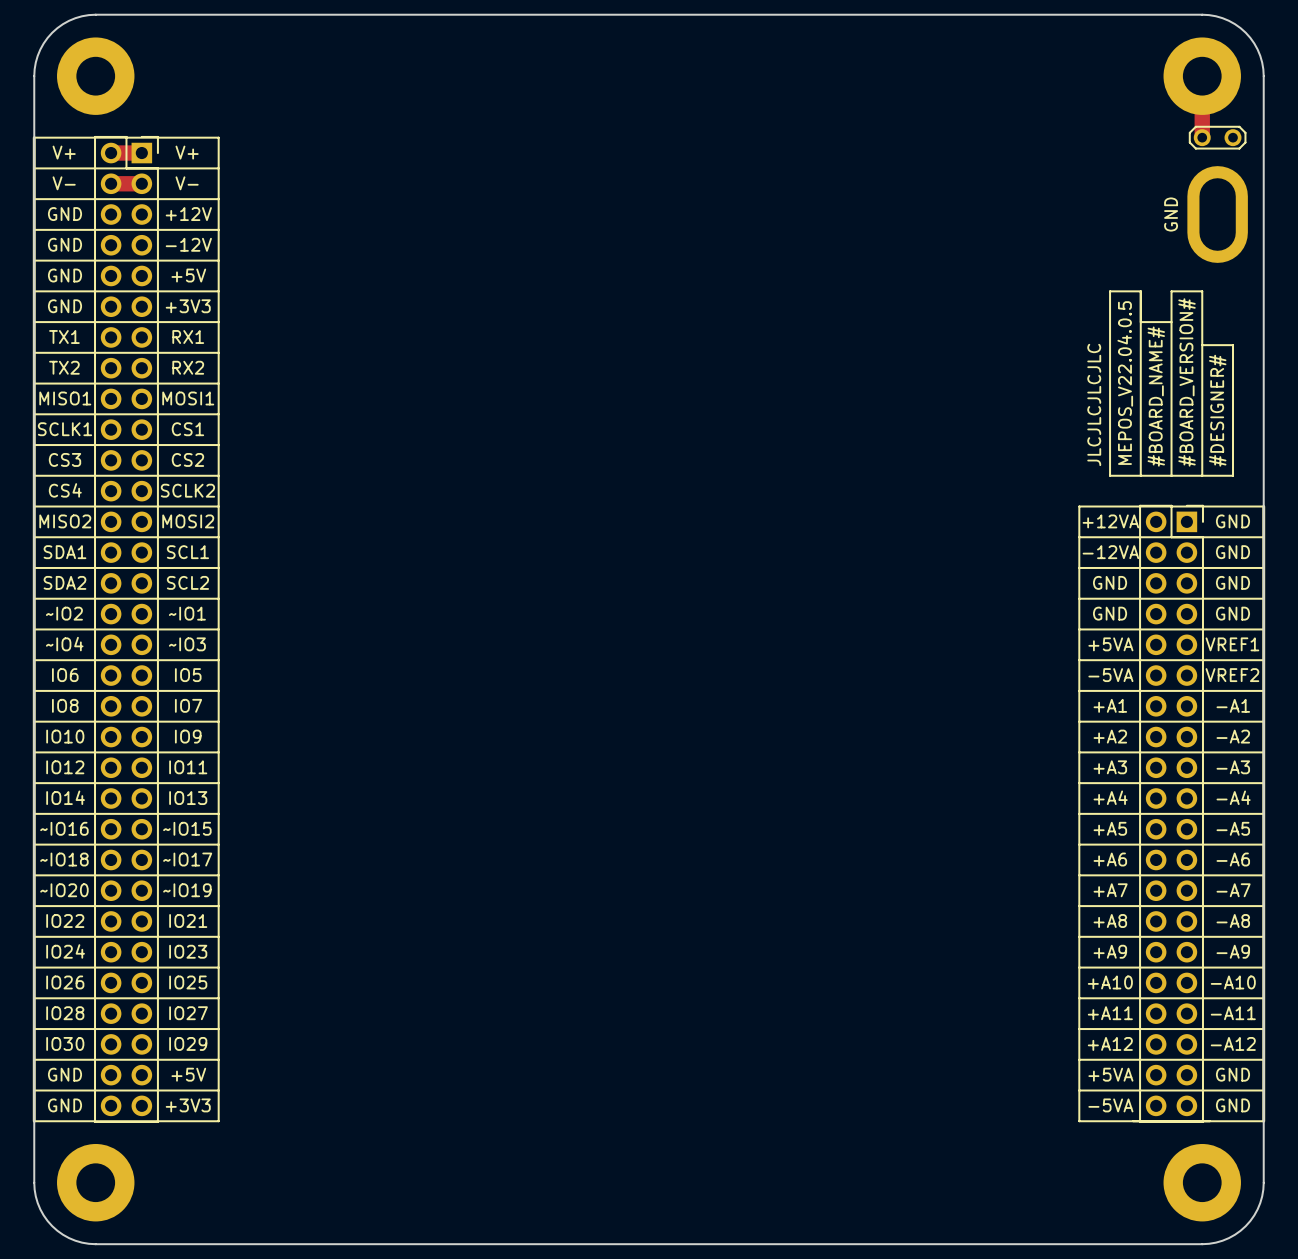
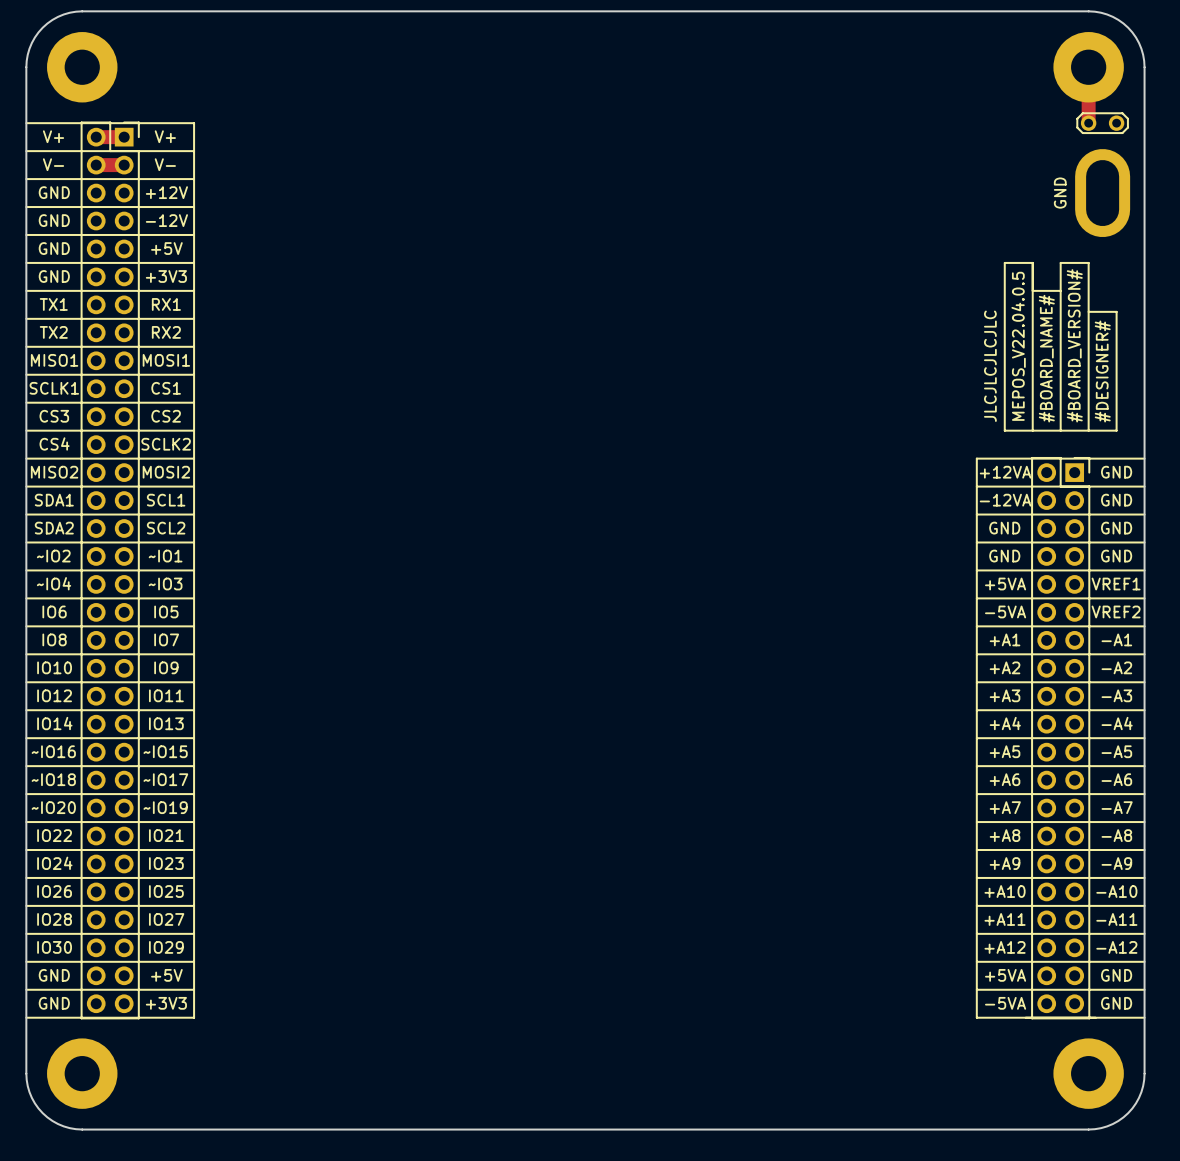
line: (34, 137) (34, 1121) -> none
line: (1263, 506) (1263, 1121) -> none

